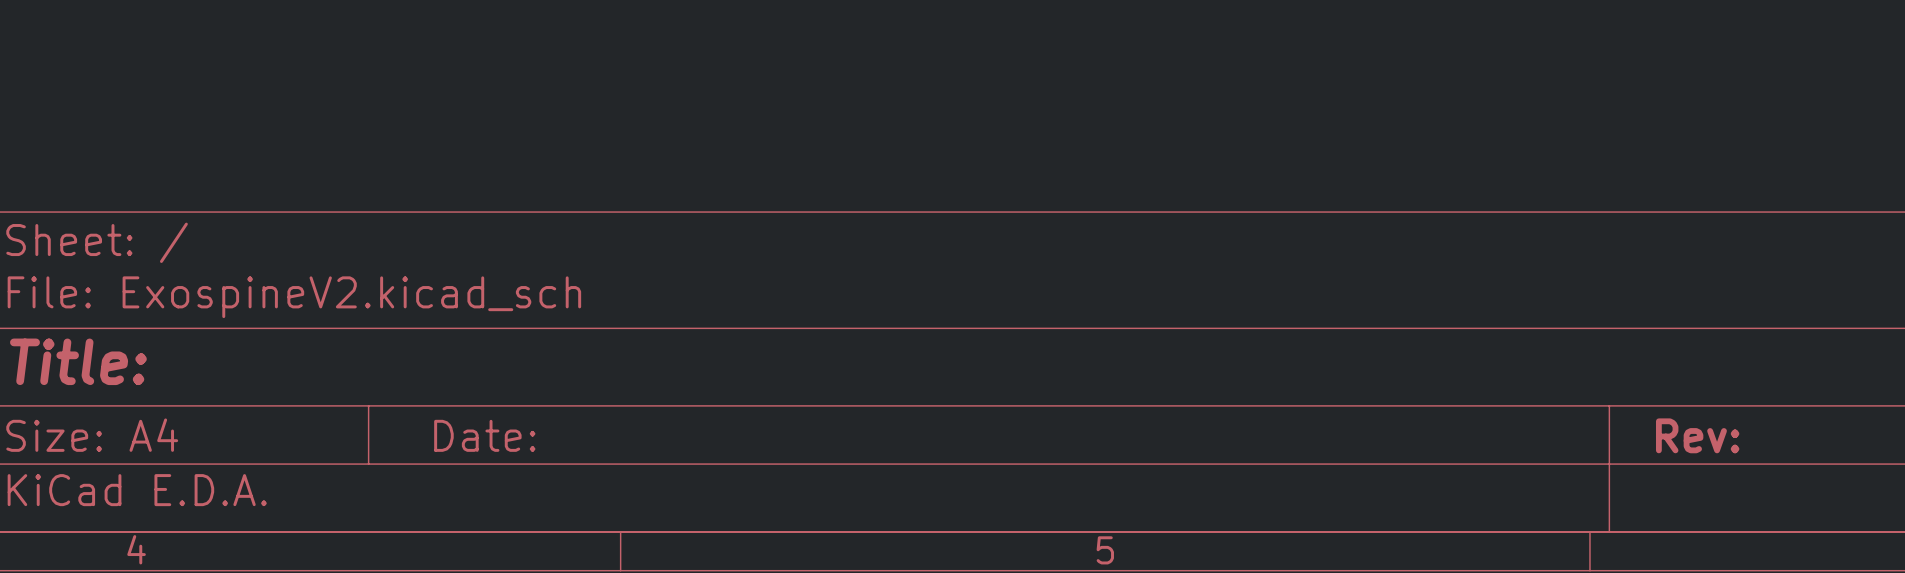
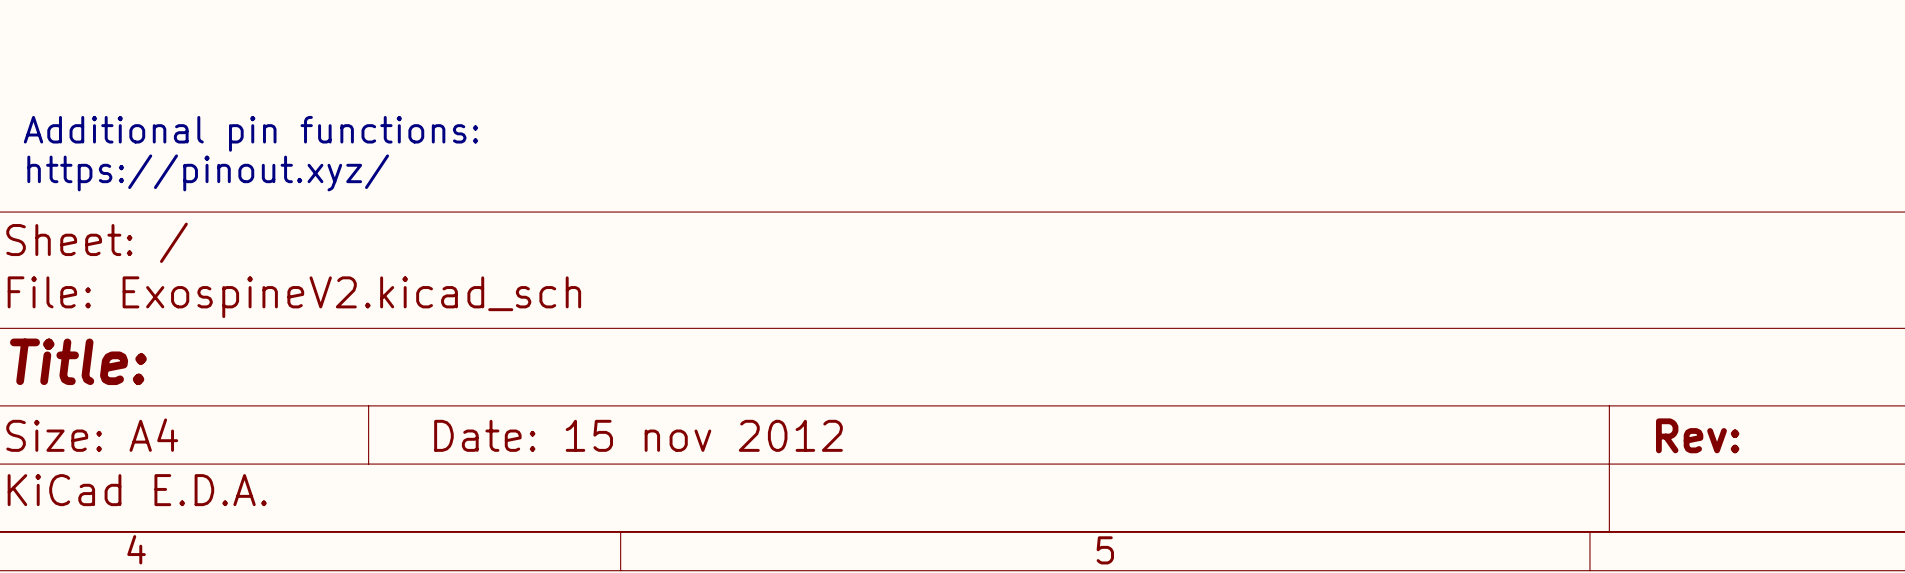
text: none -> Additional pin functions: (250, 133)
text: none -> https://pinout.xyz/ (208, 172)
title block: Date: (484, 435) -> Date: 15 nov 2012 (638, 435)

